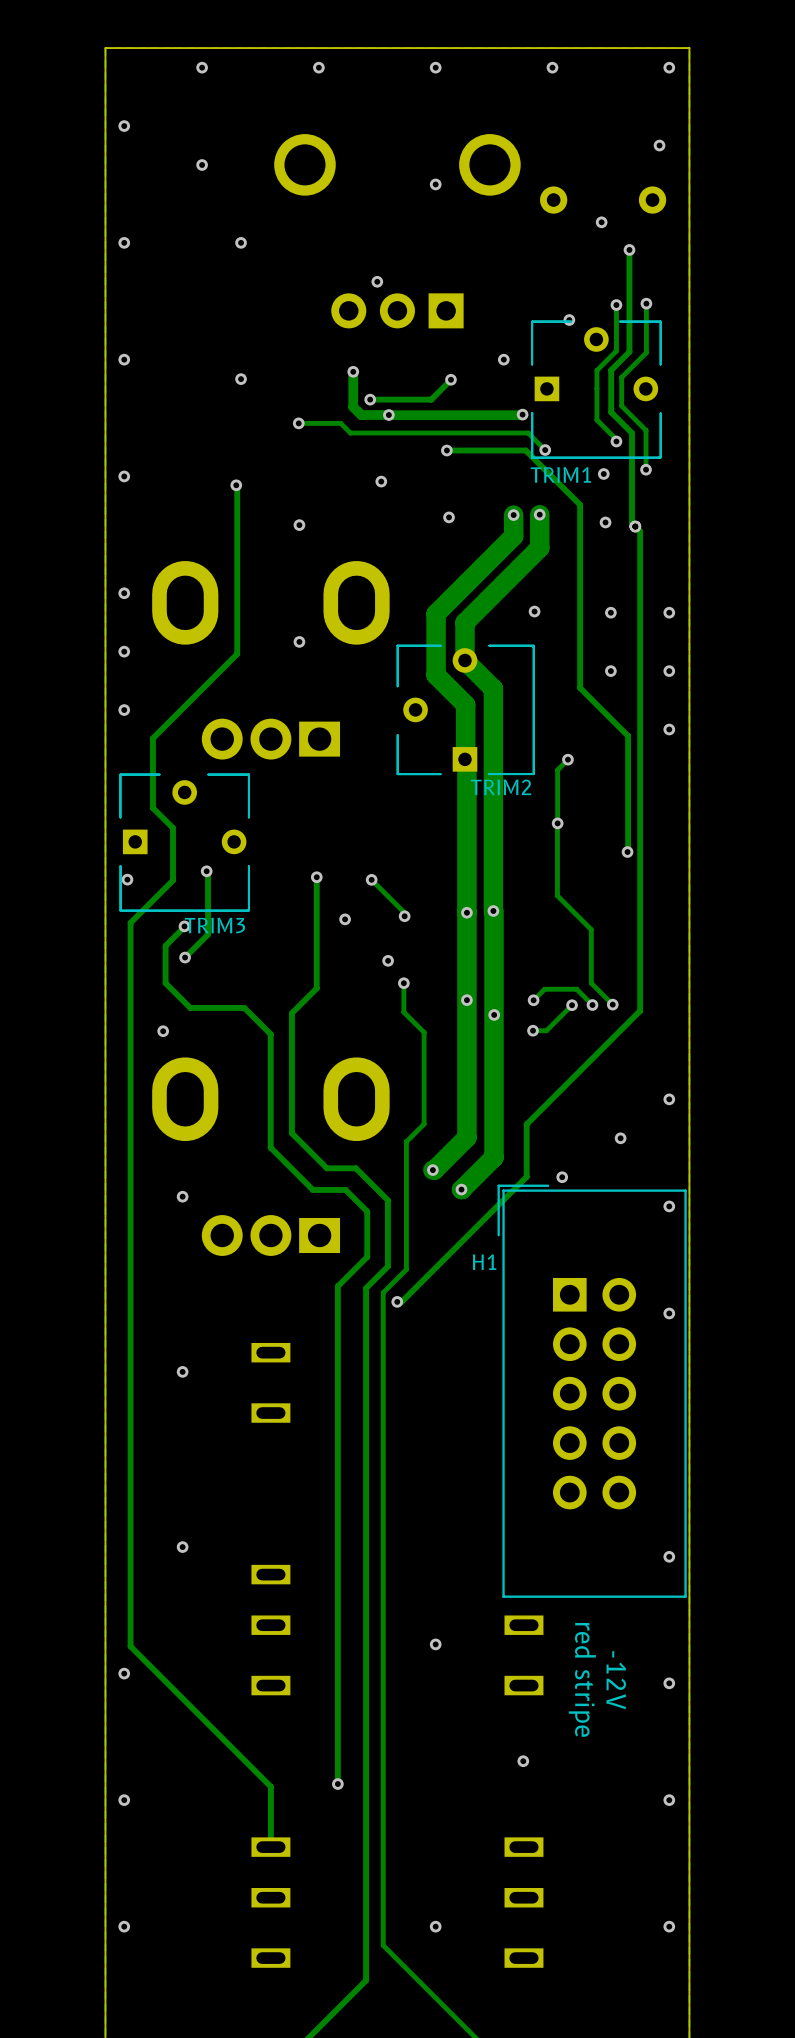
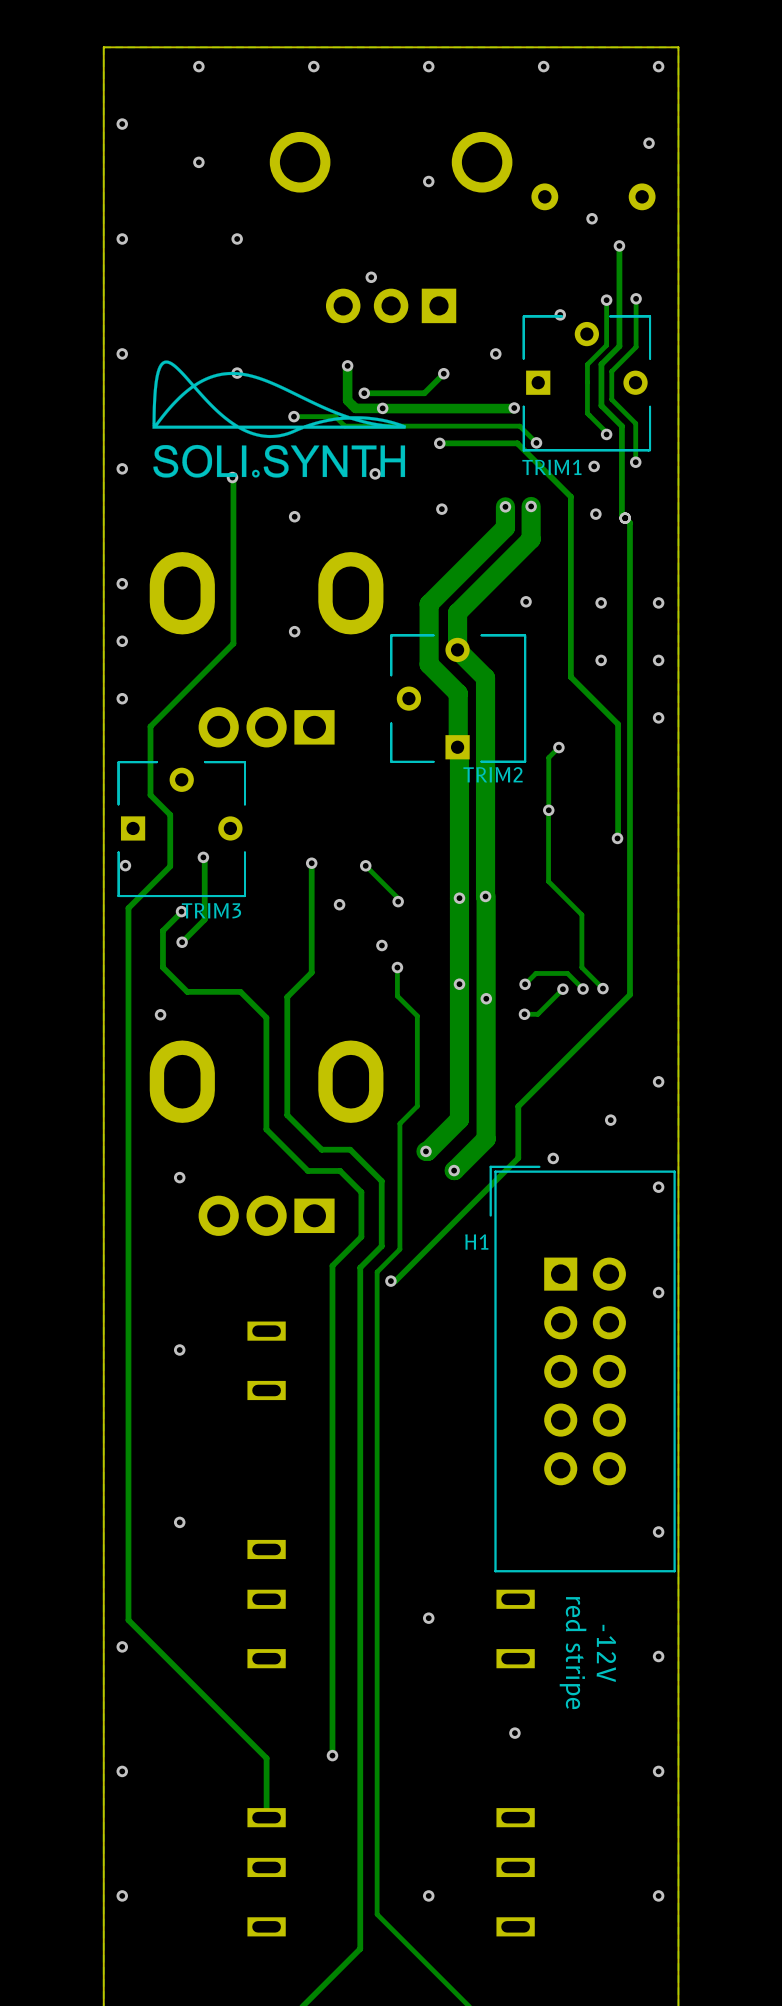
drawing: none -> [152, 360, 407, 478]

